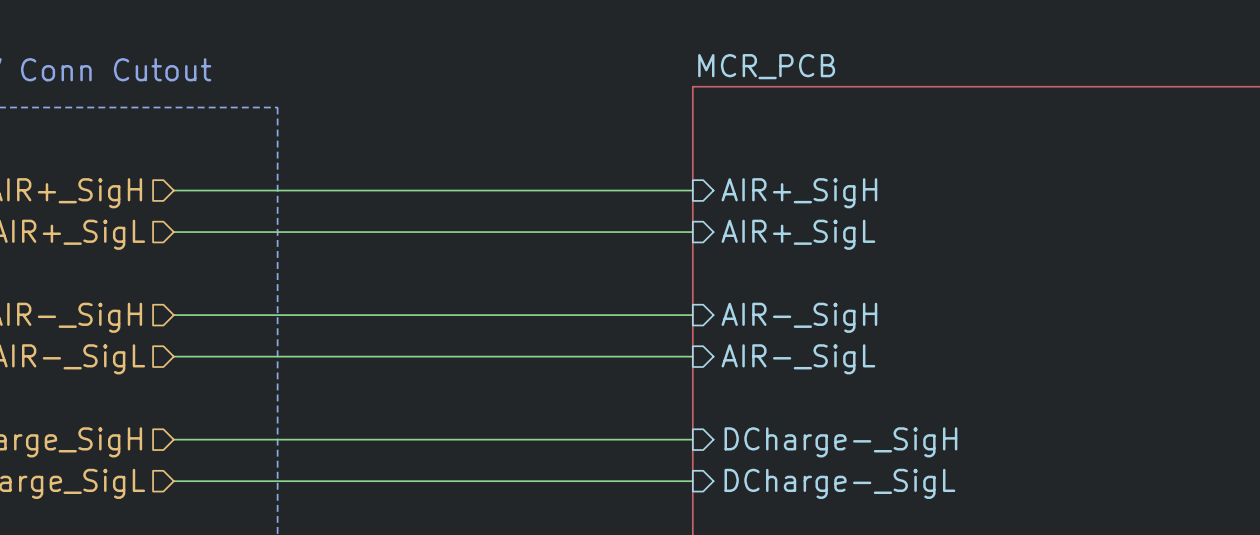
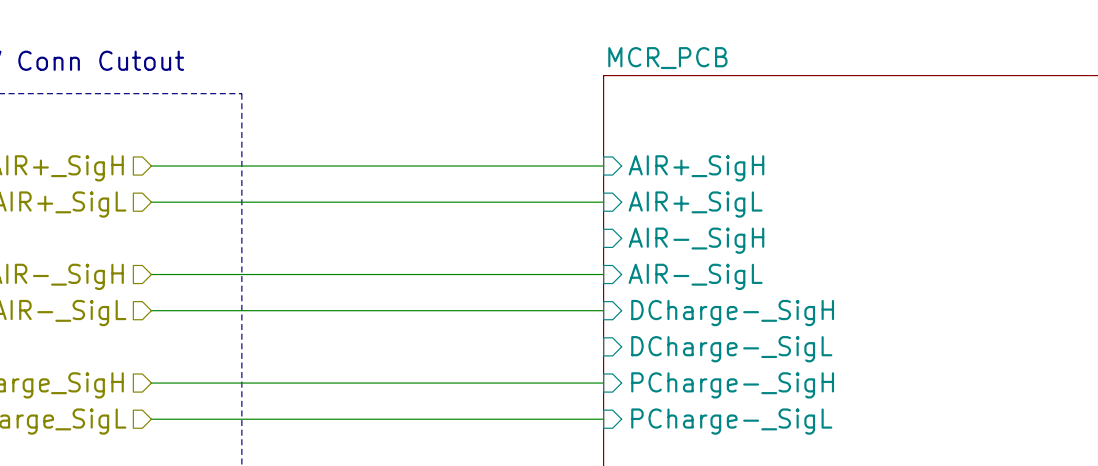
sheet pin: none -> AIR-_SigH (696, 240)
sheet pin: AIR-_SigH (799, 317) -> AIR-_SigL (695, 276)
sheet pin: AIR-_SigL (798, 359) -> DCharge-_SigH (732, 313)
sheet pin: none -> DCharge-_SigL (731, 349)
sheet pin: DCharge-_SigH (840, 442) -> PCharge-_SigH (732, 385)
sheet pin: DCharge-_SigL (839, 483) -> PCharge-_SigL (731, 421)

